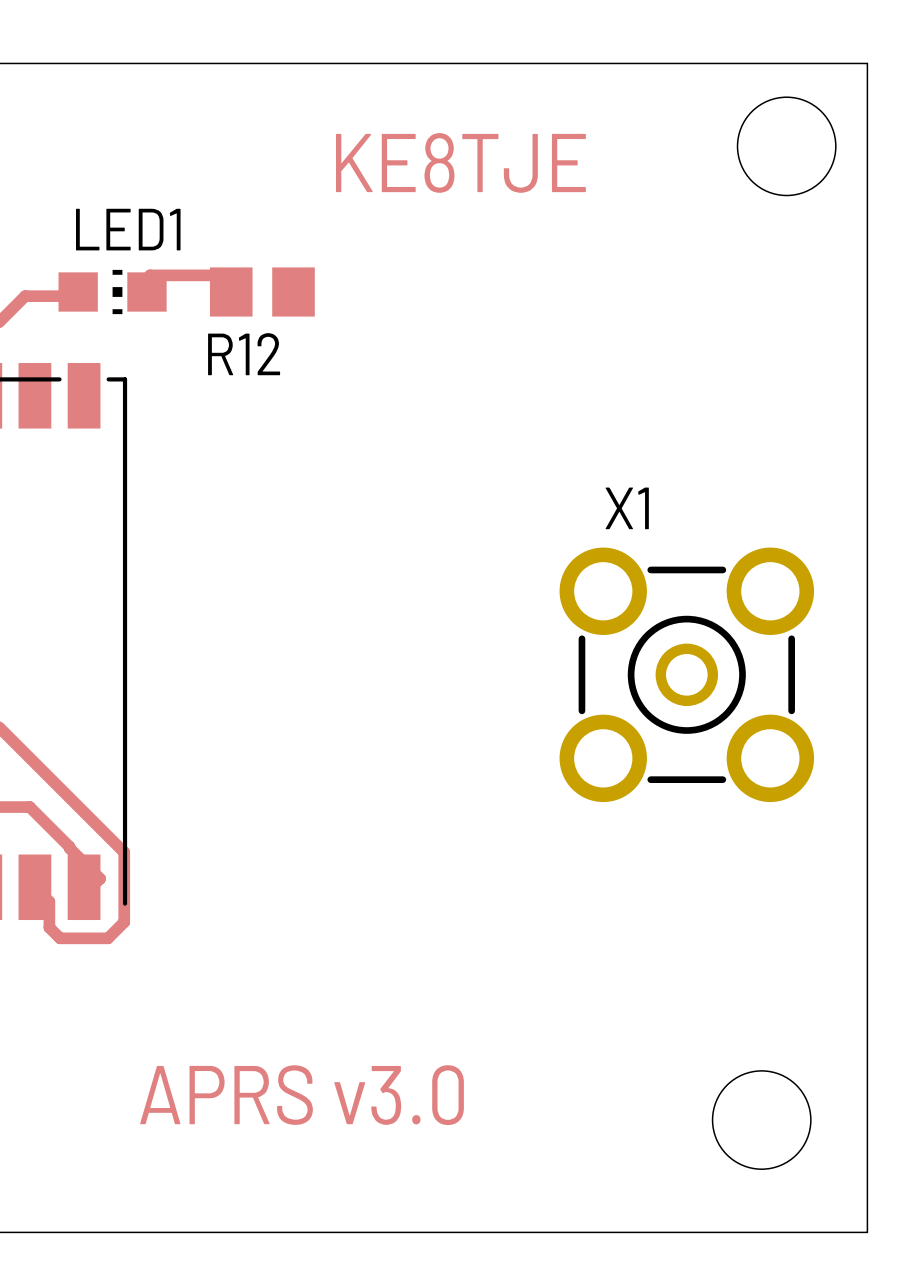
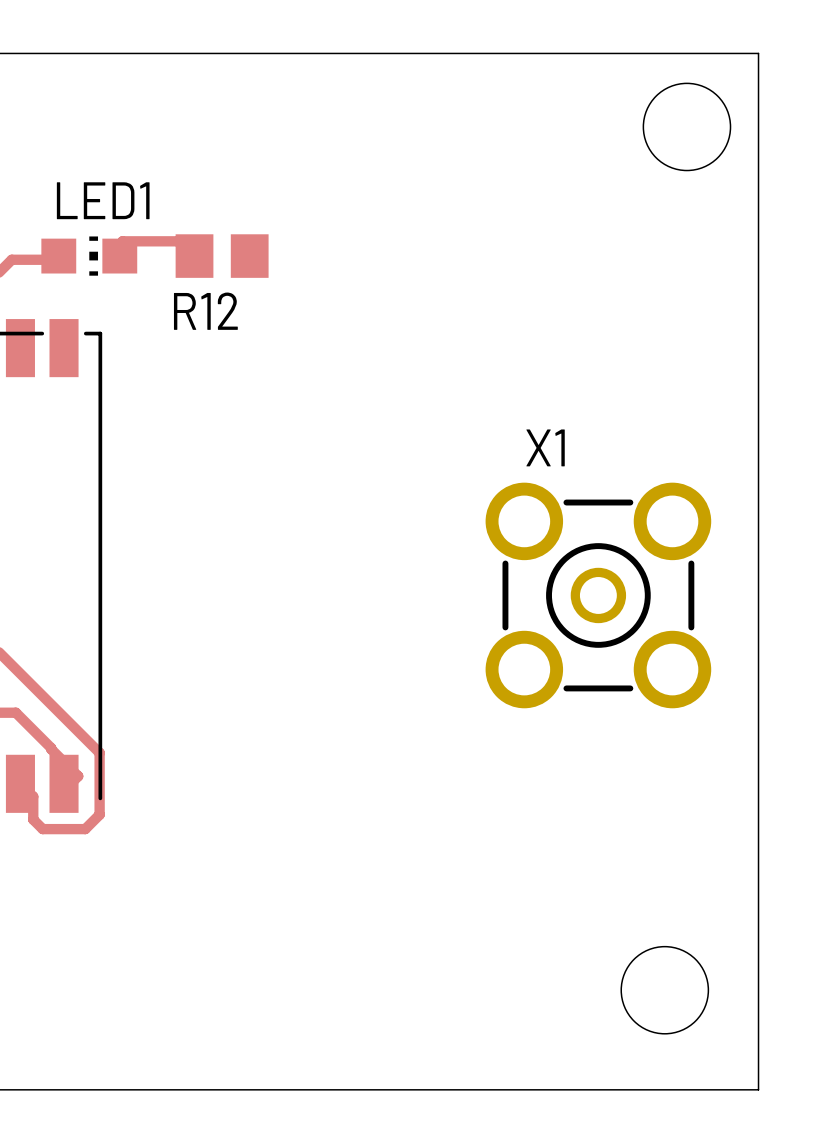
text: KE8TJE (460, 162) -> none
text: APRS v3.0 (301, 1095) -> none

